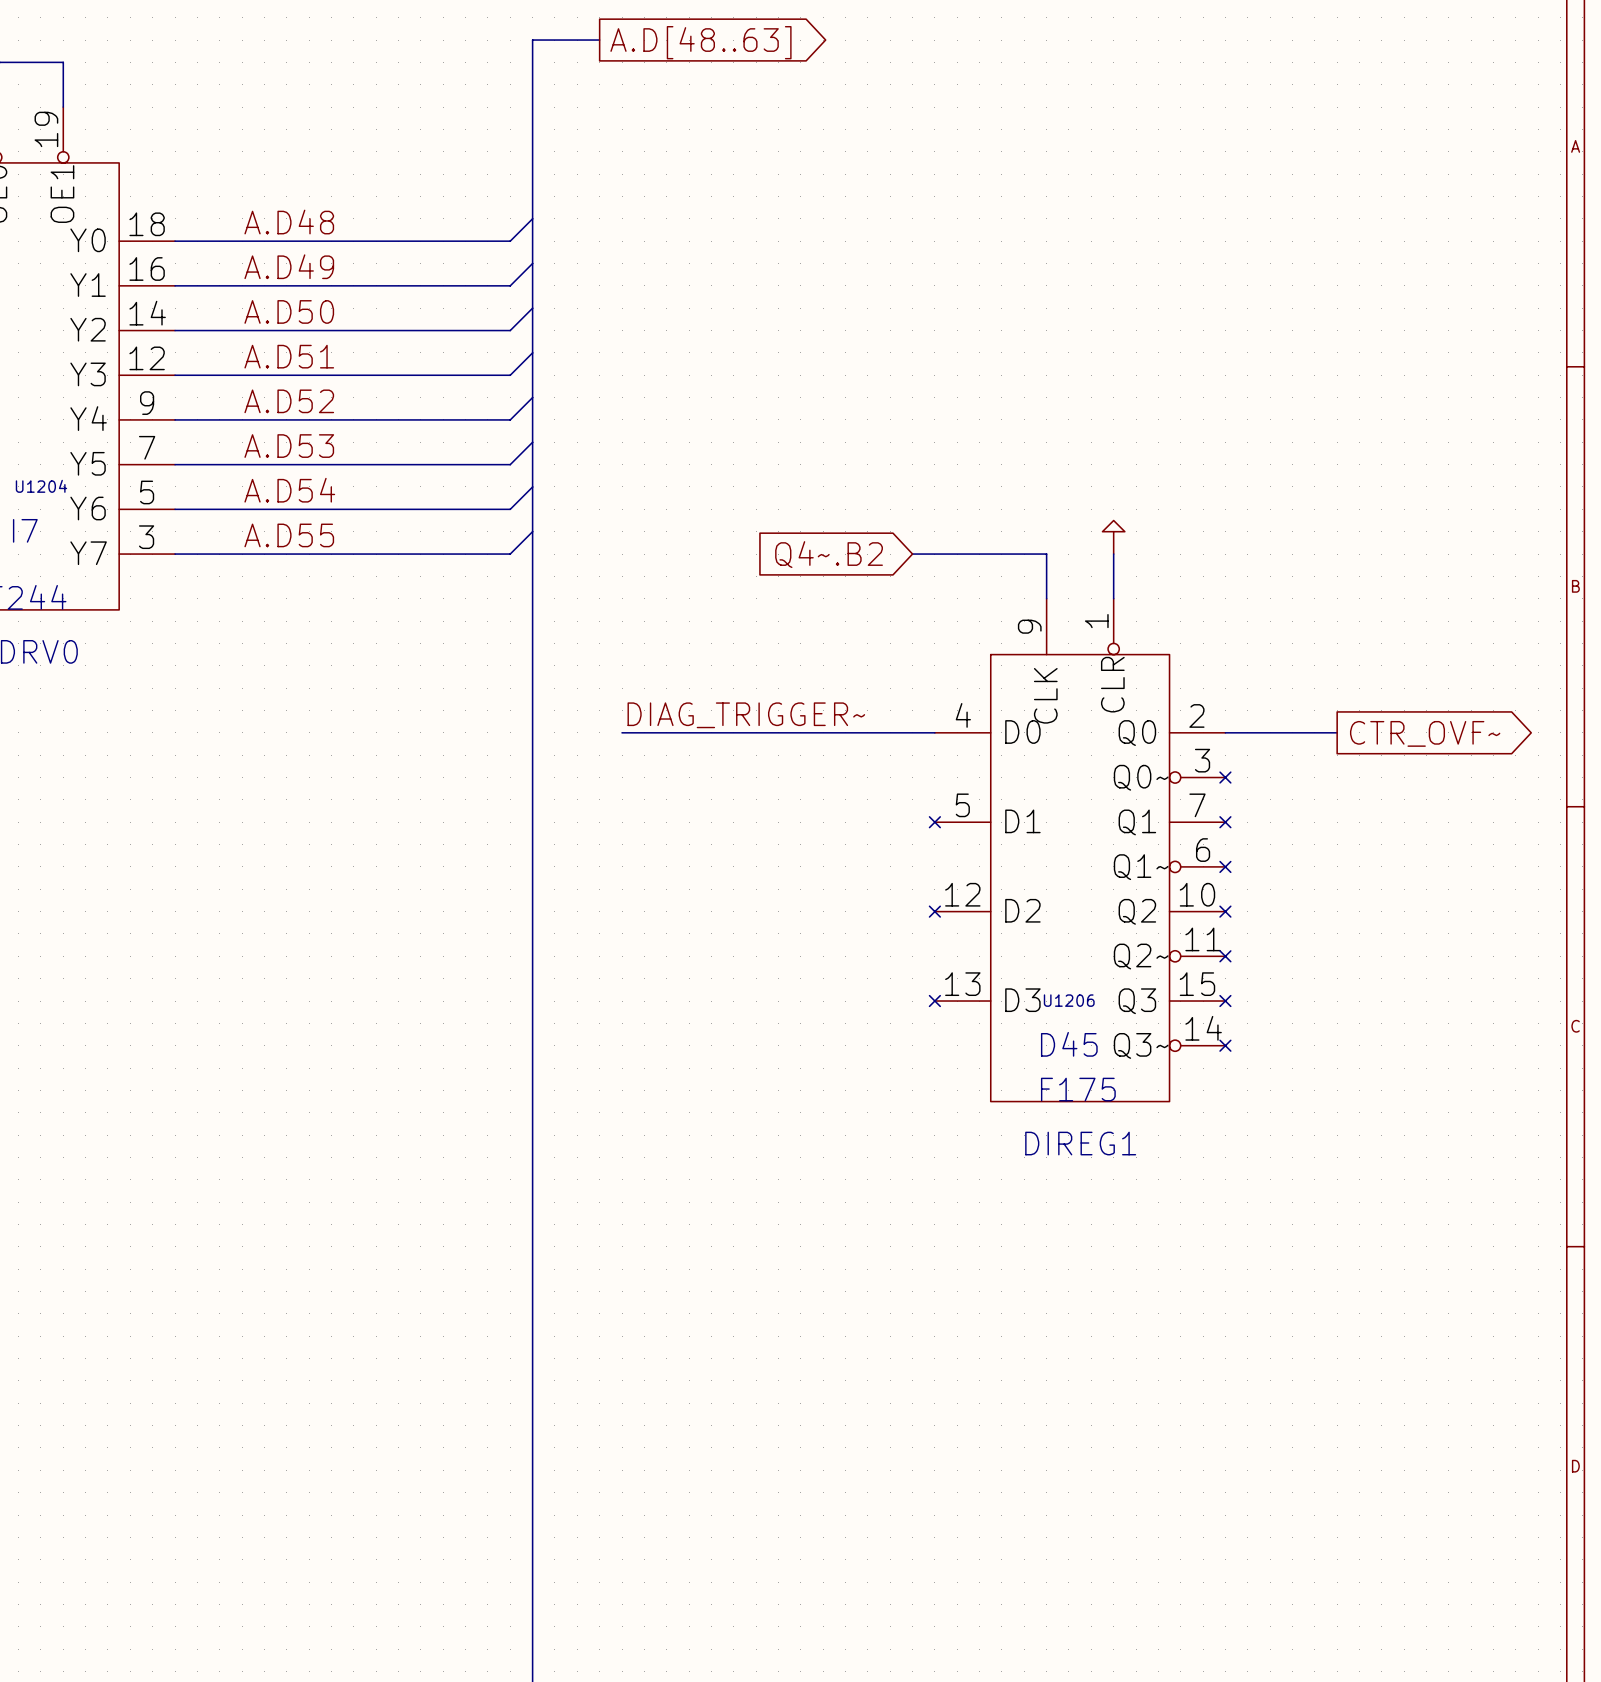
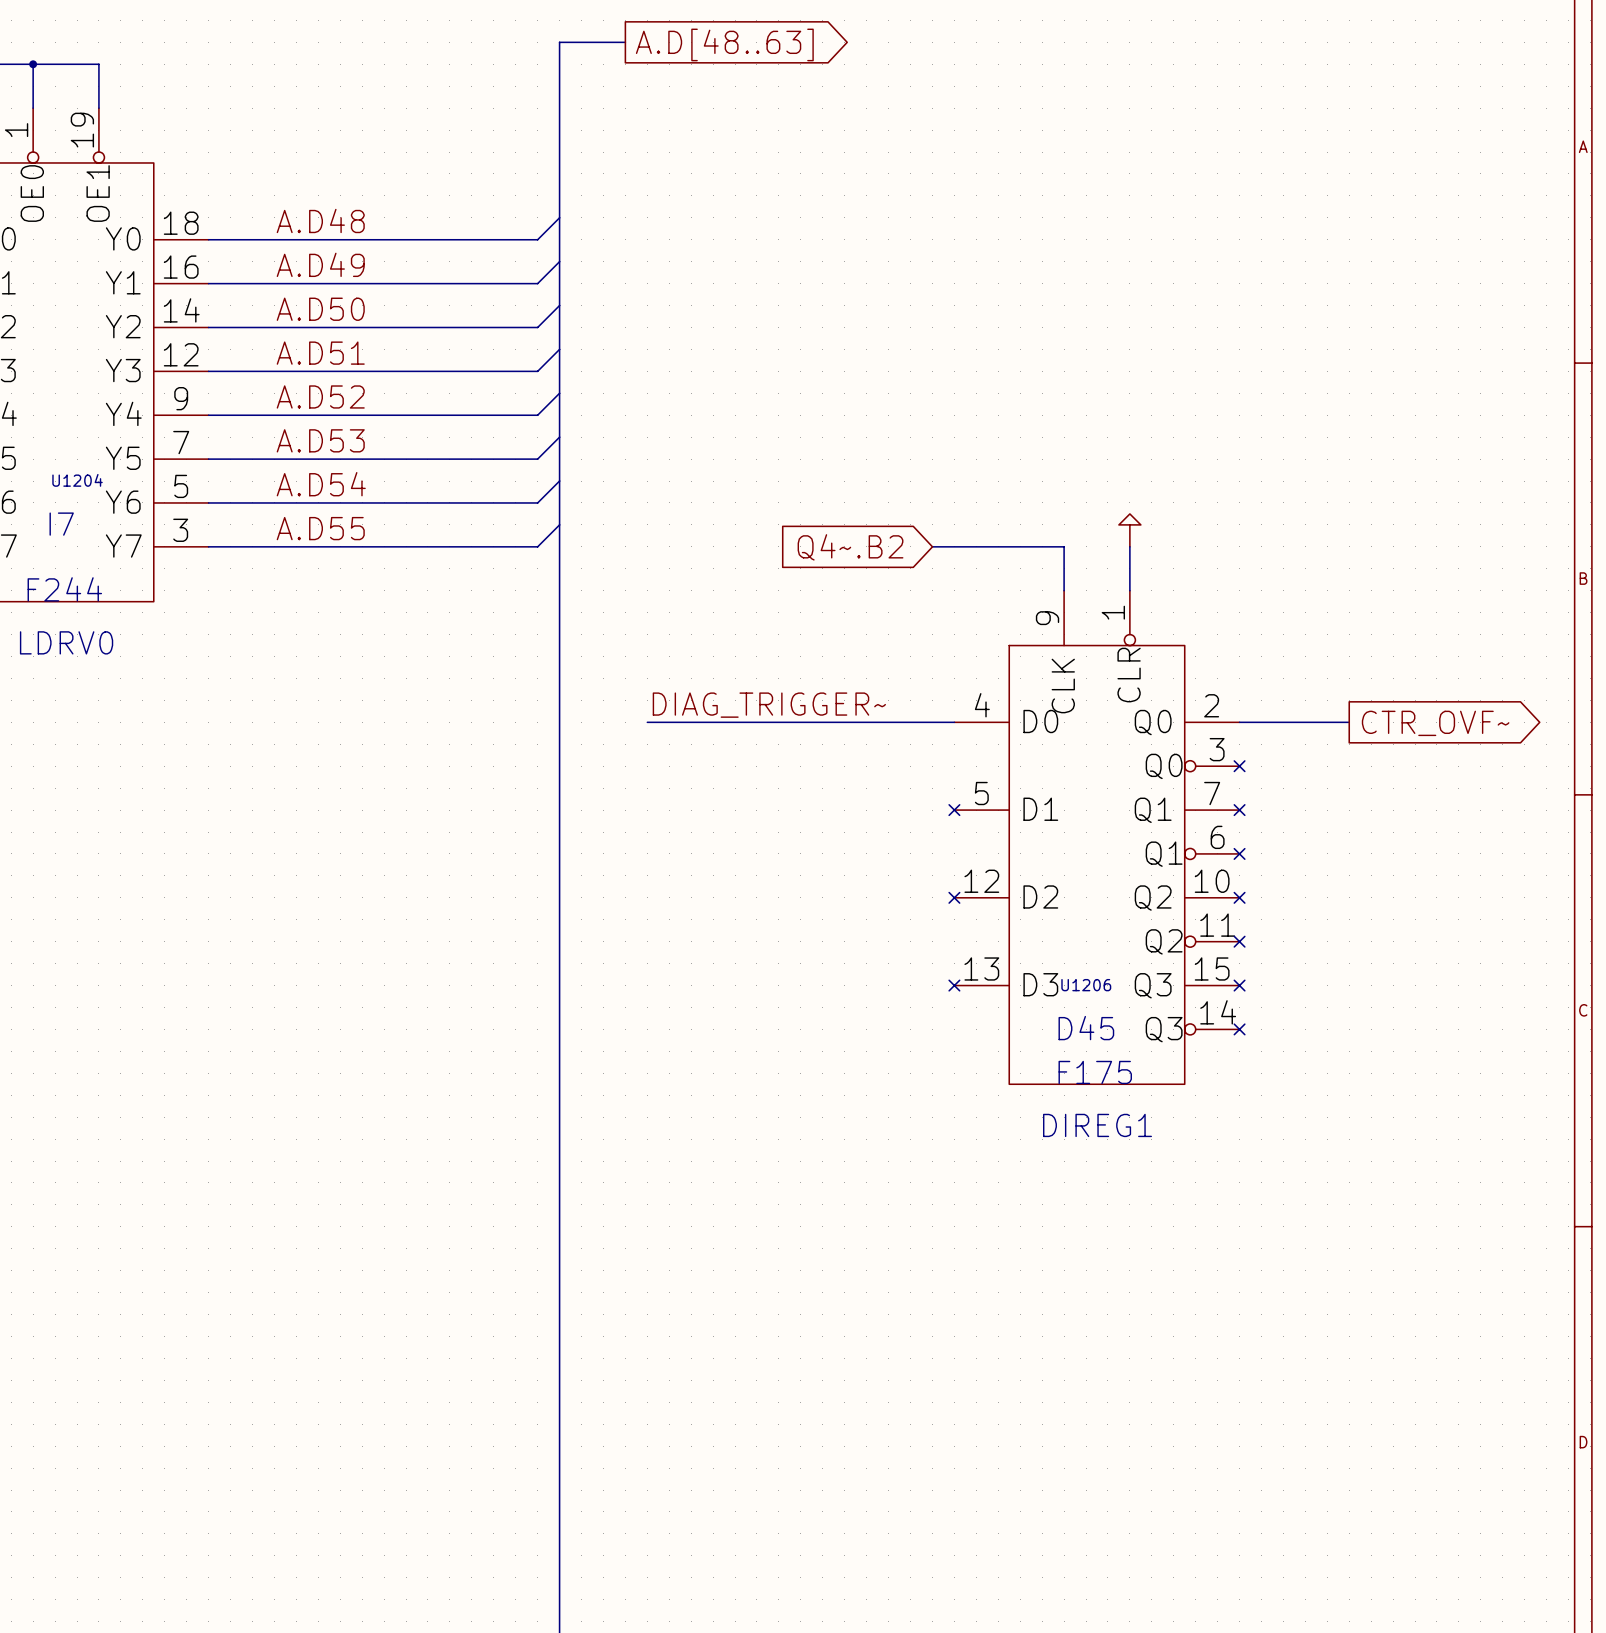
U1206 pin name: Q0~ (1141, 777) -> Q0 (1164, 766)
U1206 pin name: Q1~ (1141, 867) -> Q1 (1164, 854)
U1206 pin name: Q2~ (1141, 956) -> Q2 (1164, 941)
U1206 pin name: Q3~ (1141, 1045) -> Q3 (1164, 1029)

